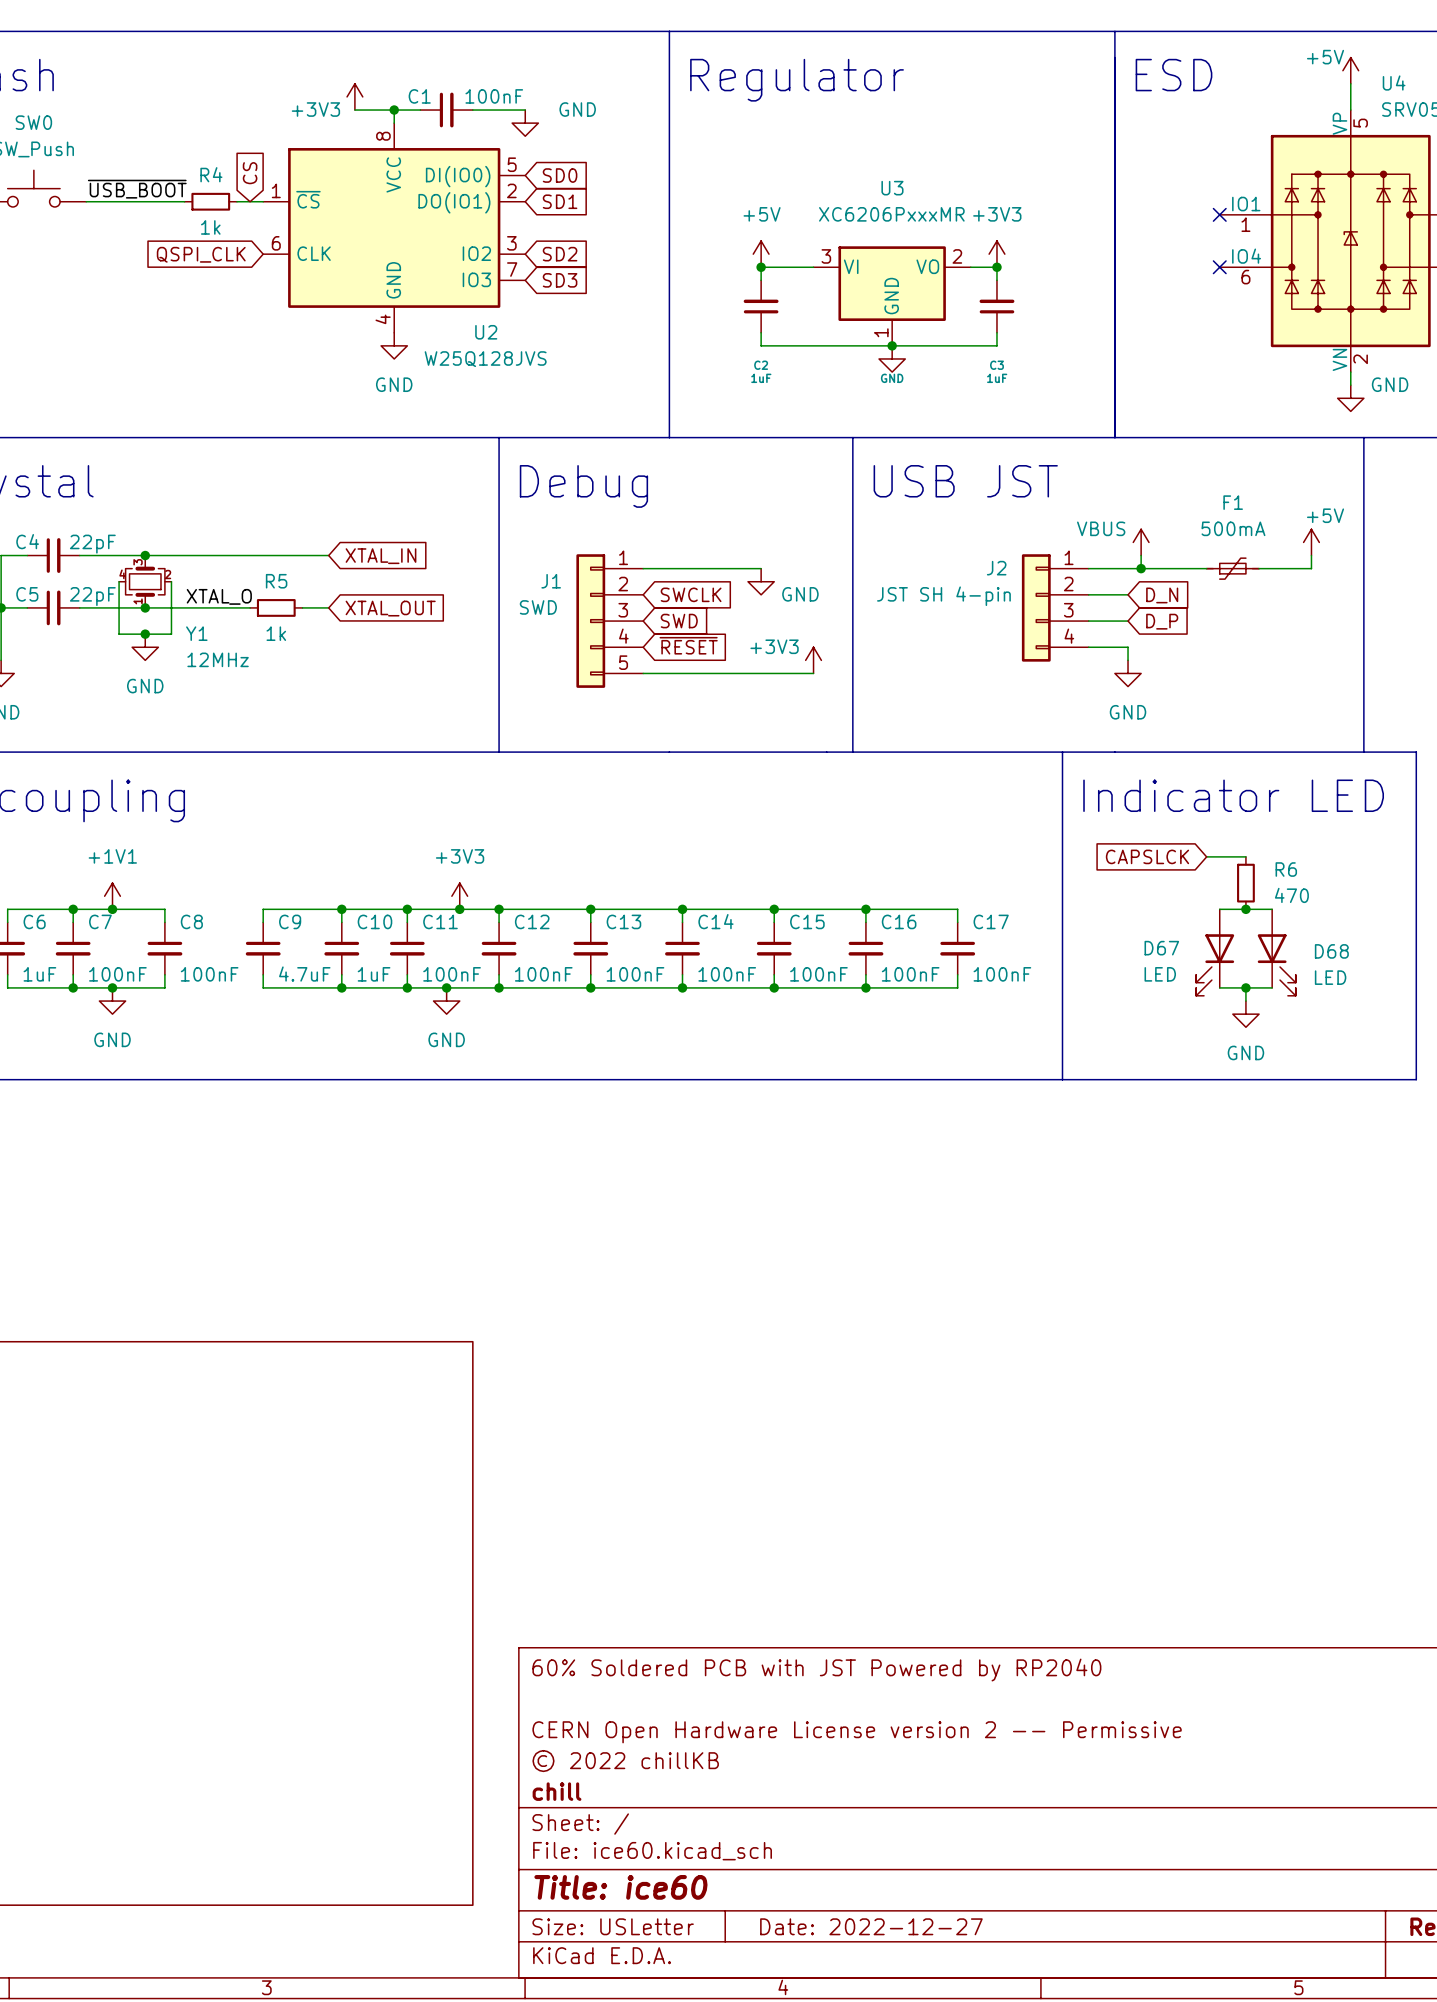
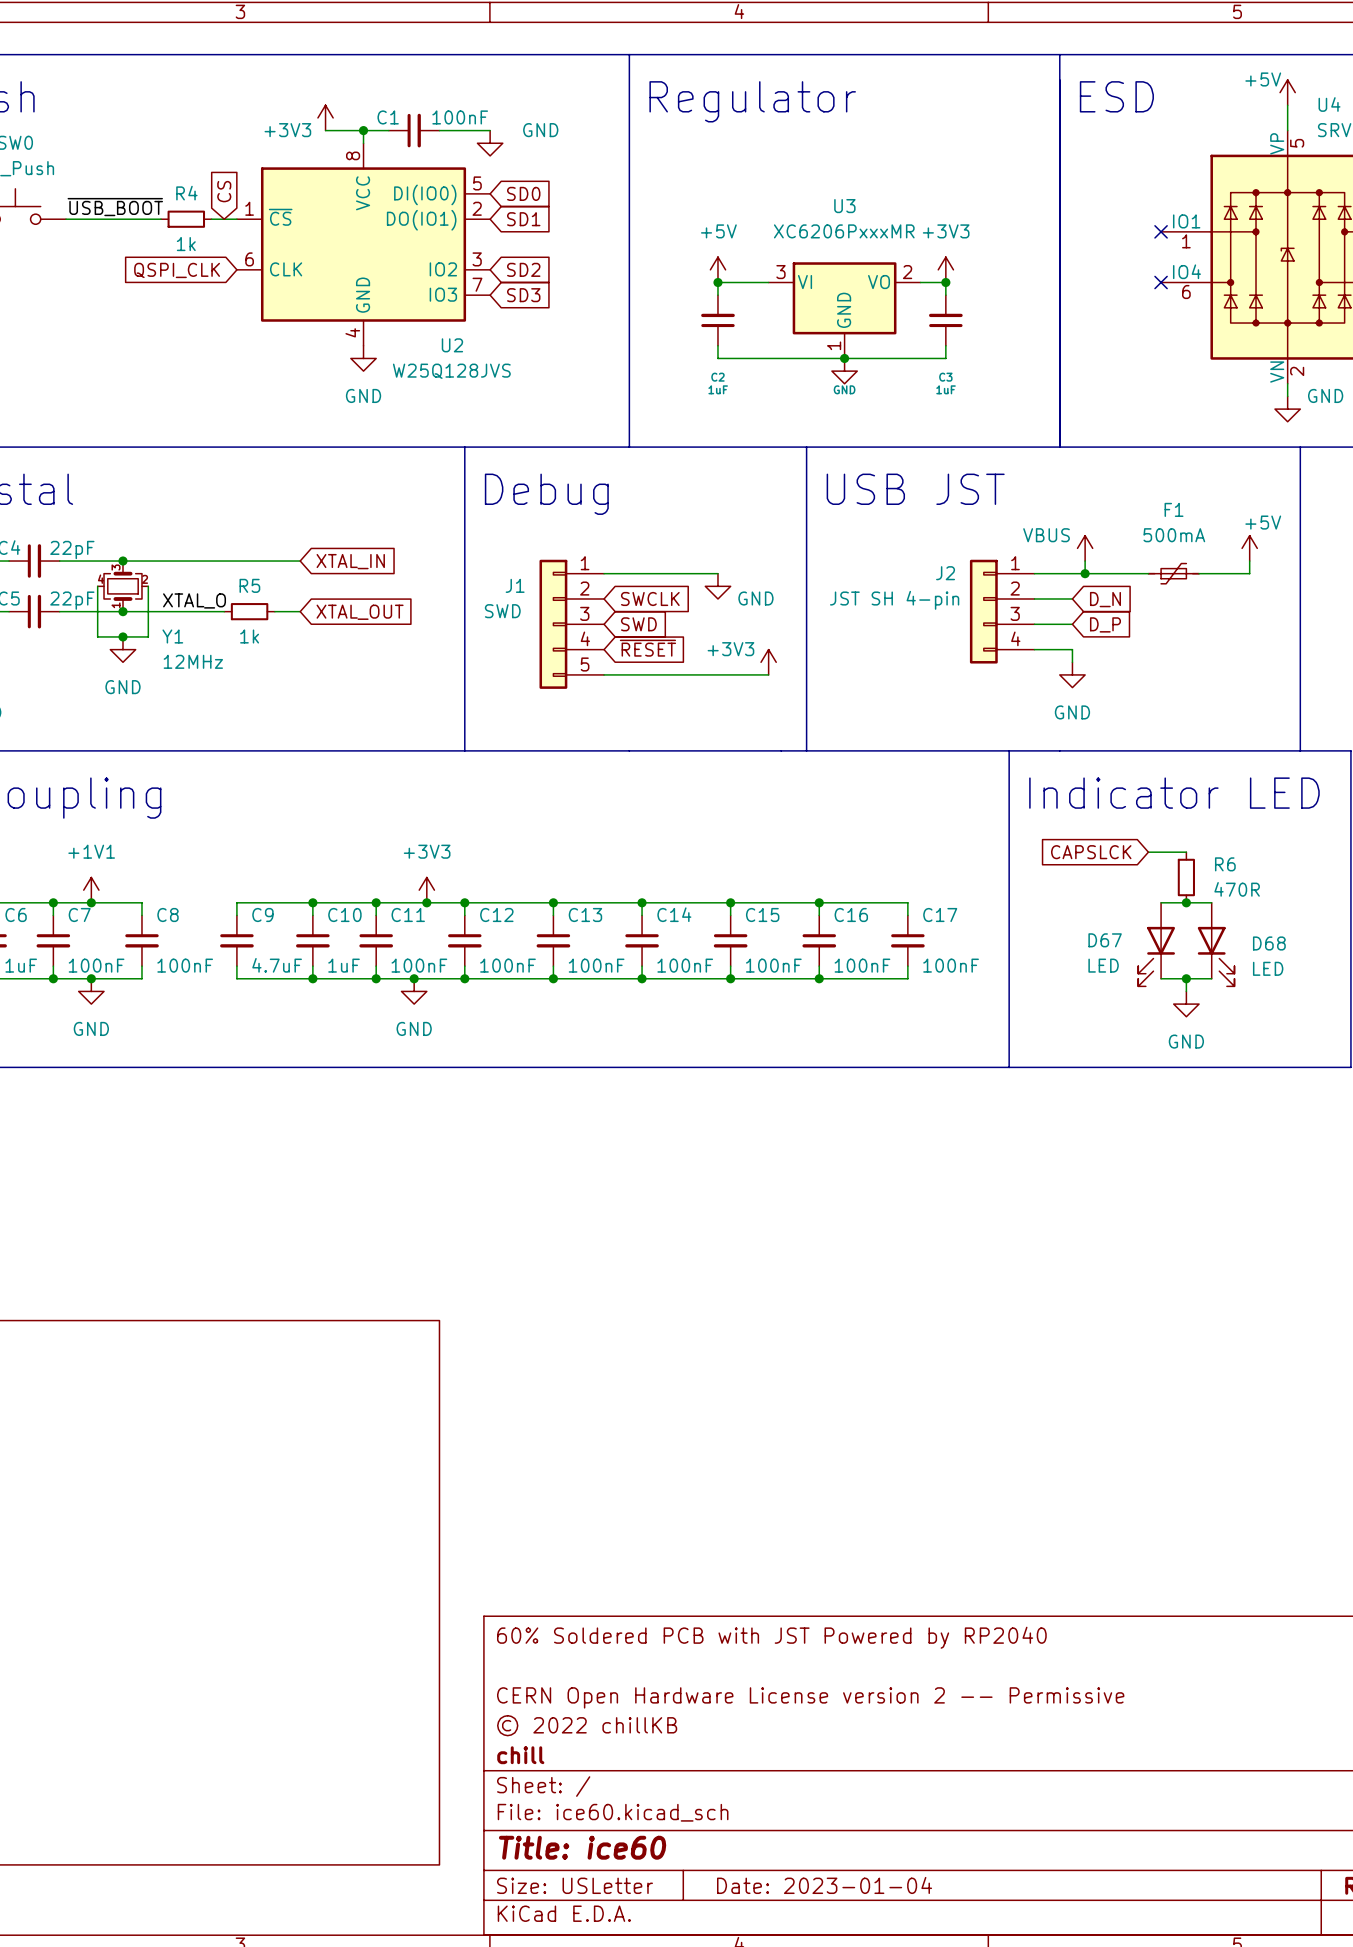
R6 value: 470 (1291, 895) -> 470R (1237, 889)
title block: Date: 2022-12-27 (871, 1926) -> Date: 2023-01-04 (824, 1885)

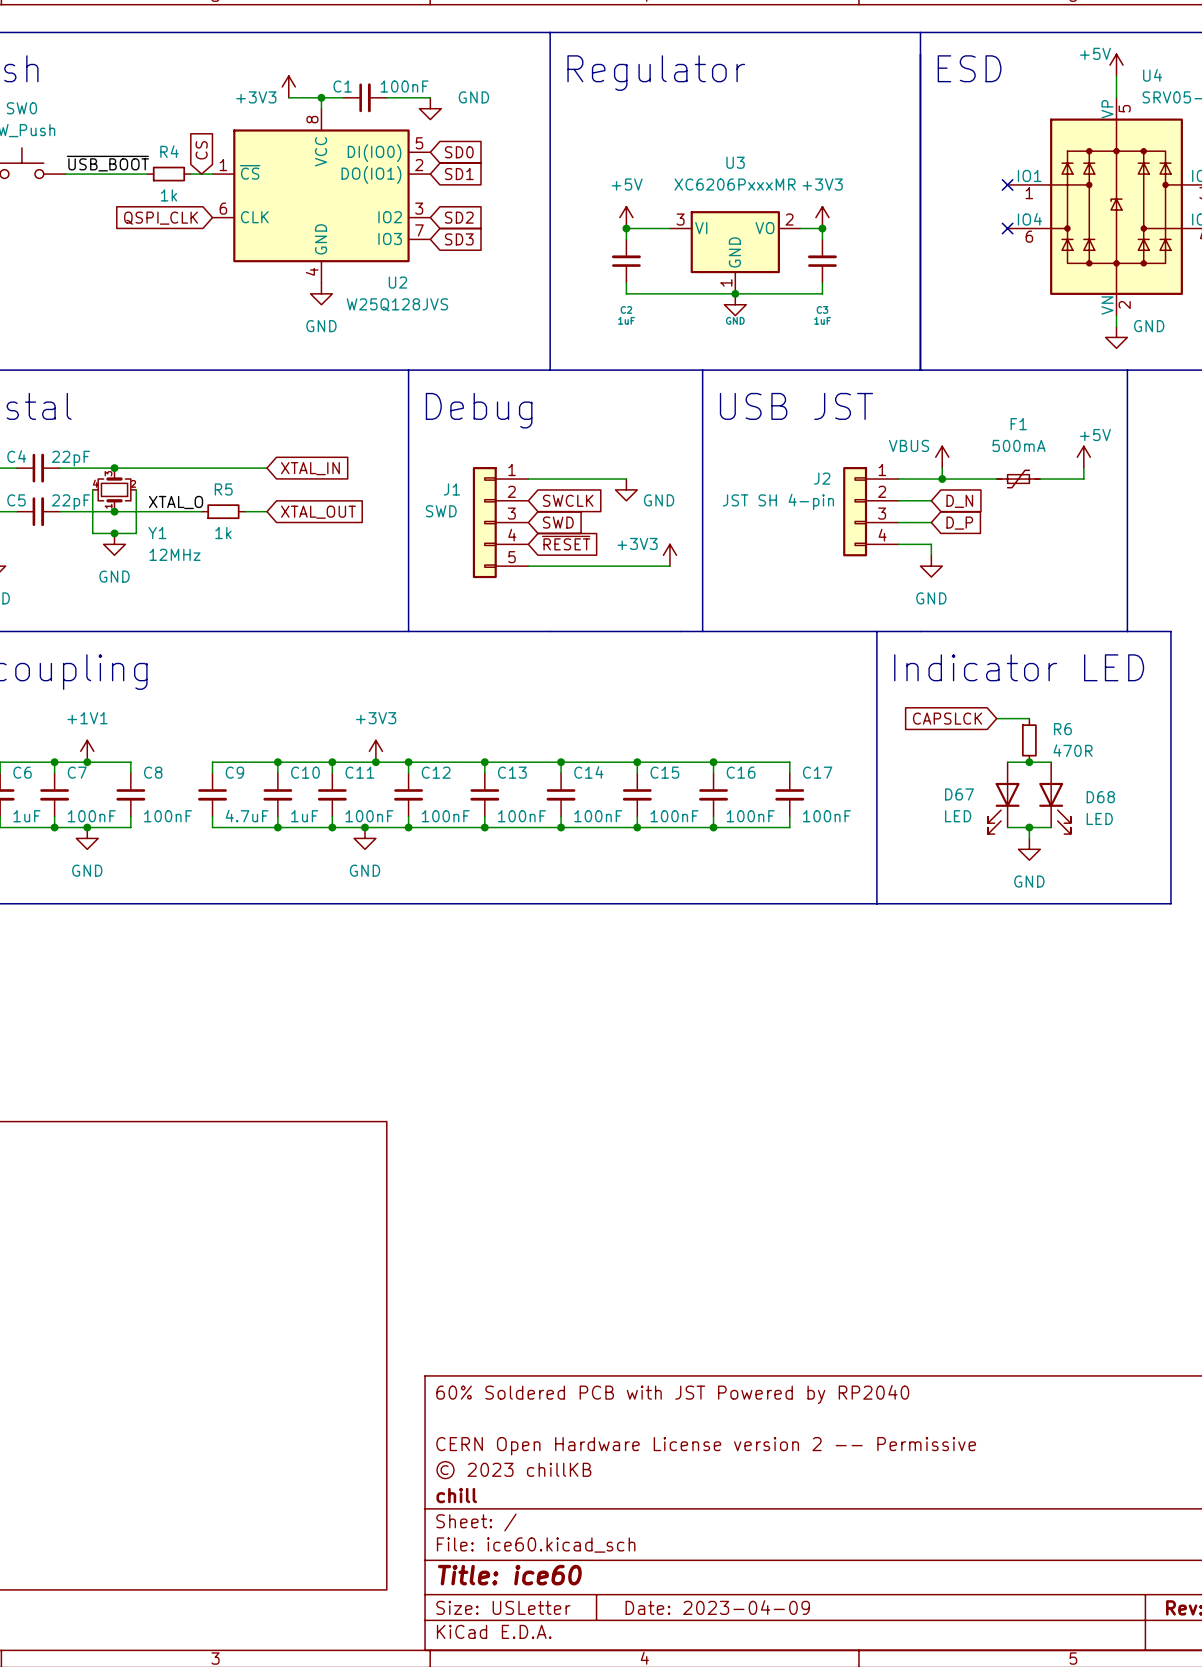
title block: © 2022 chillKB (587, 1725) -> © 2023 chillKB (513, 1470)
title block: Date: 2023-01-04 (824, 1885) -> Date: 2023-04-09 (717, 1607)

